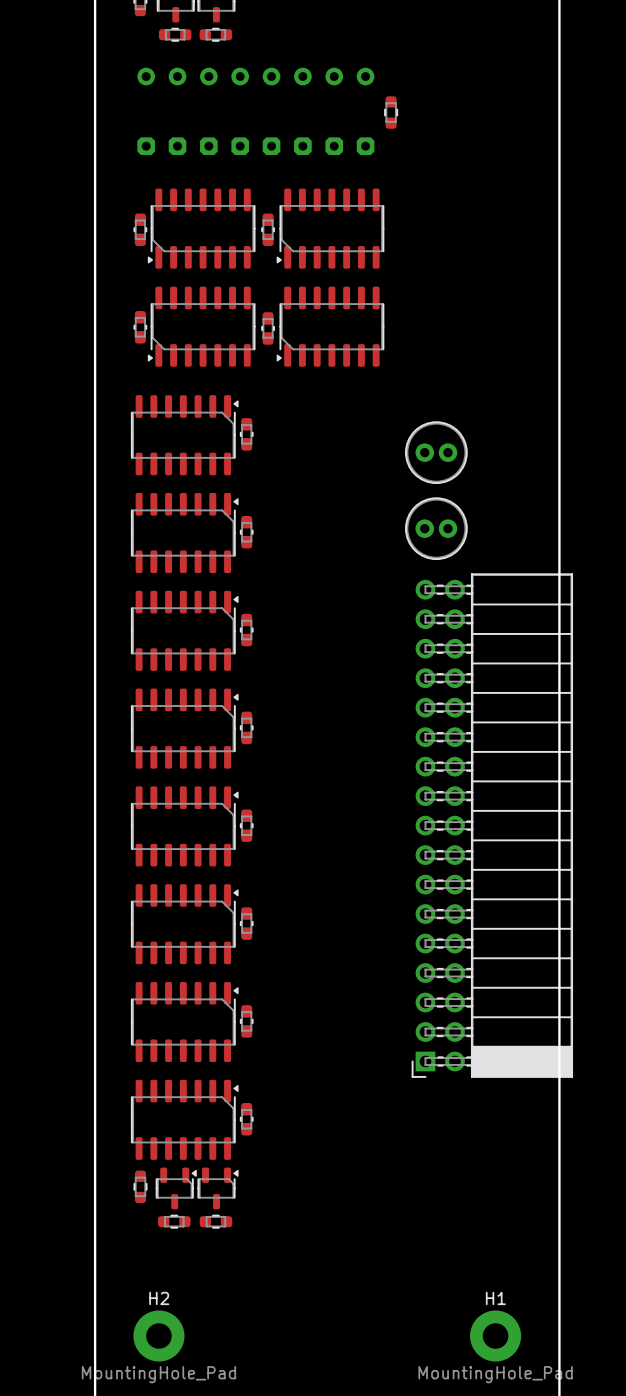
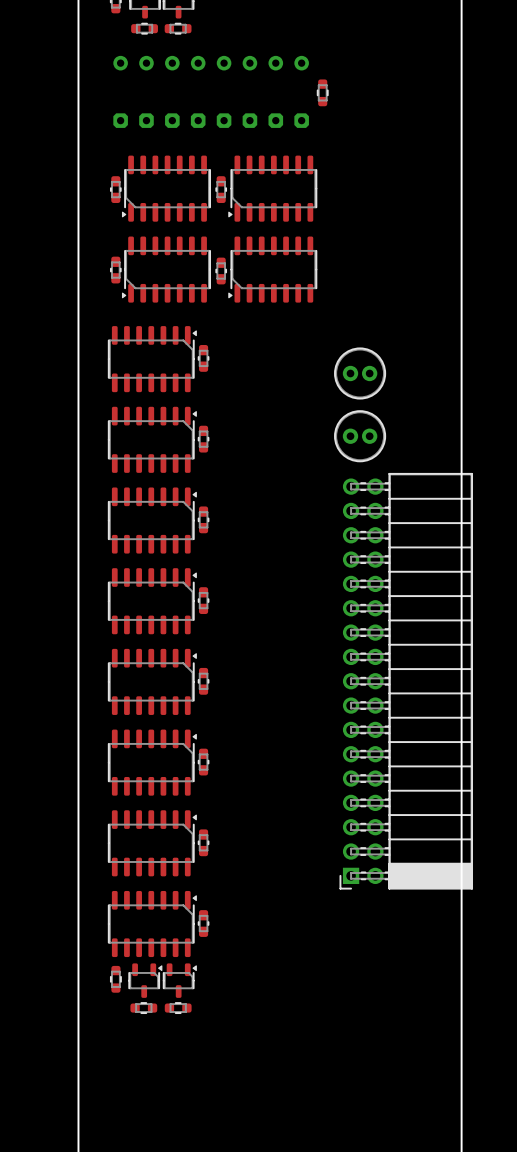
H2: MountingHole_Pad (158, 1336) -> none
H1: MountingHole_Pad (495, 1336) -> none

